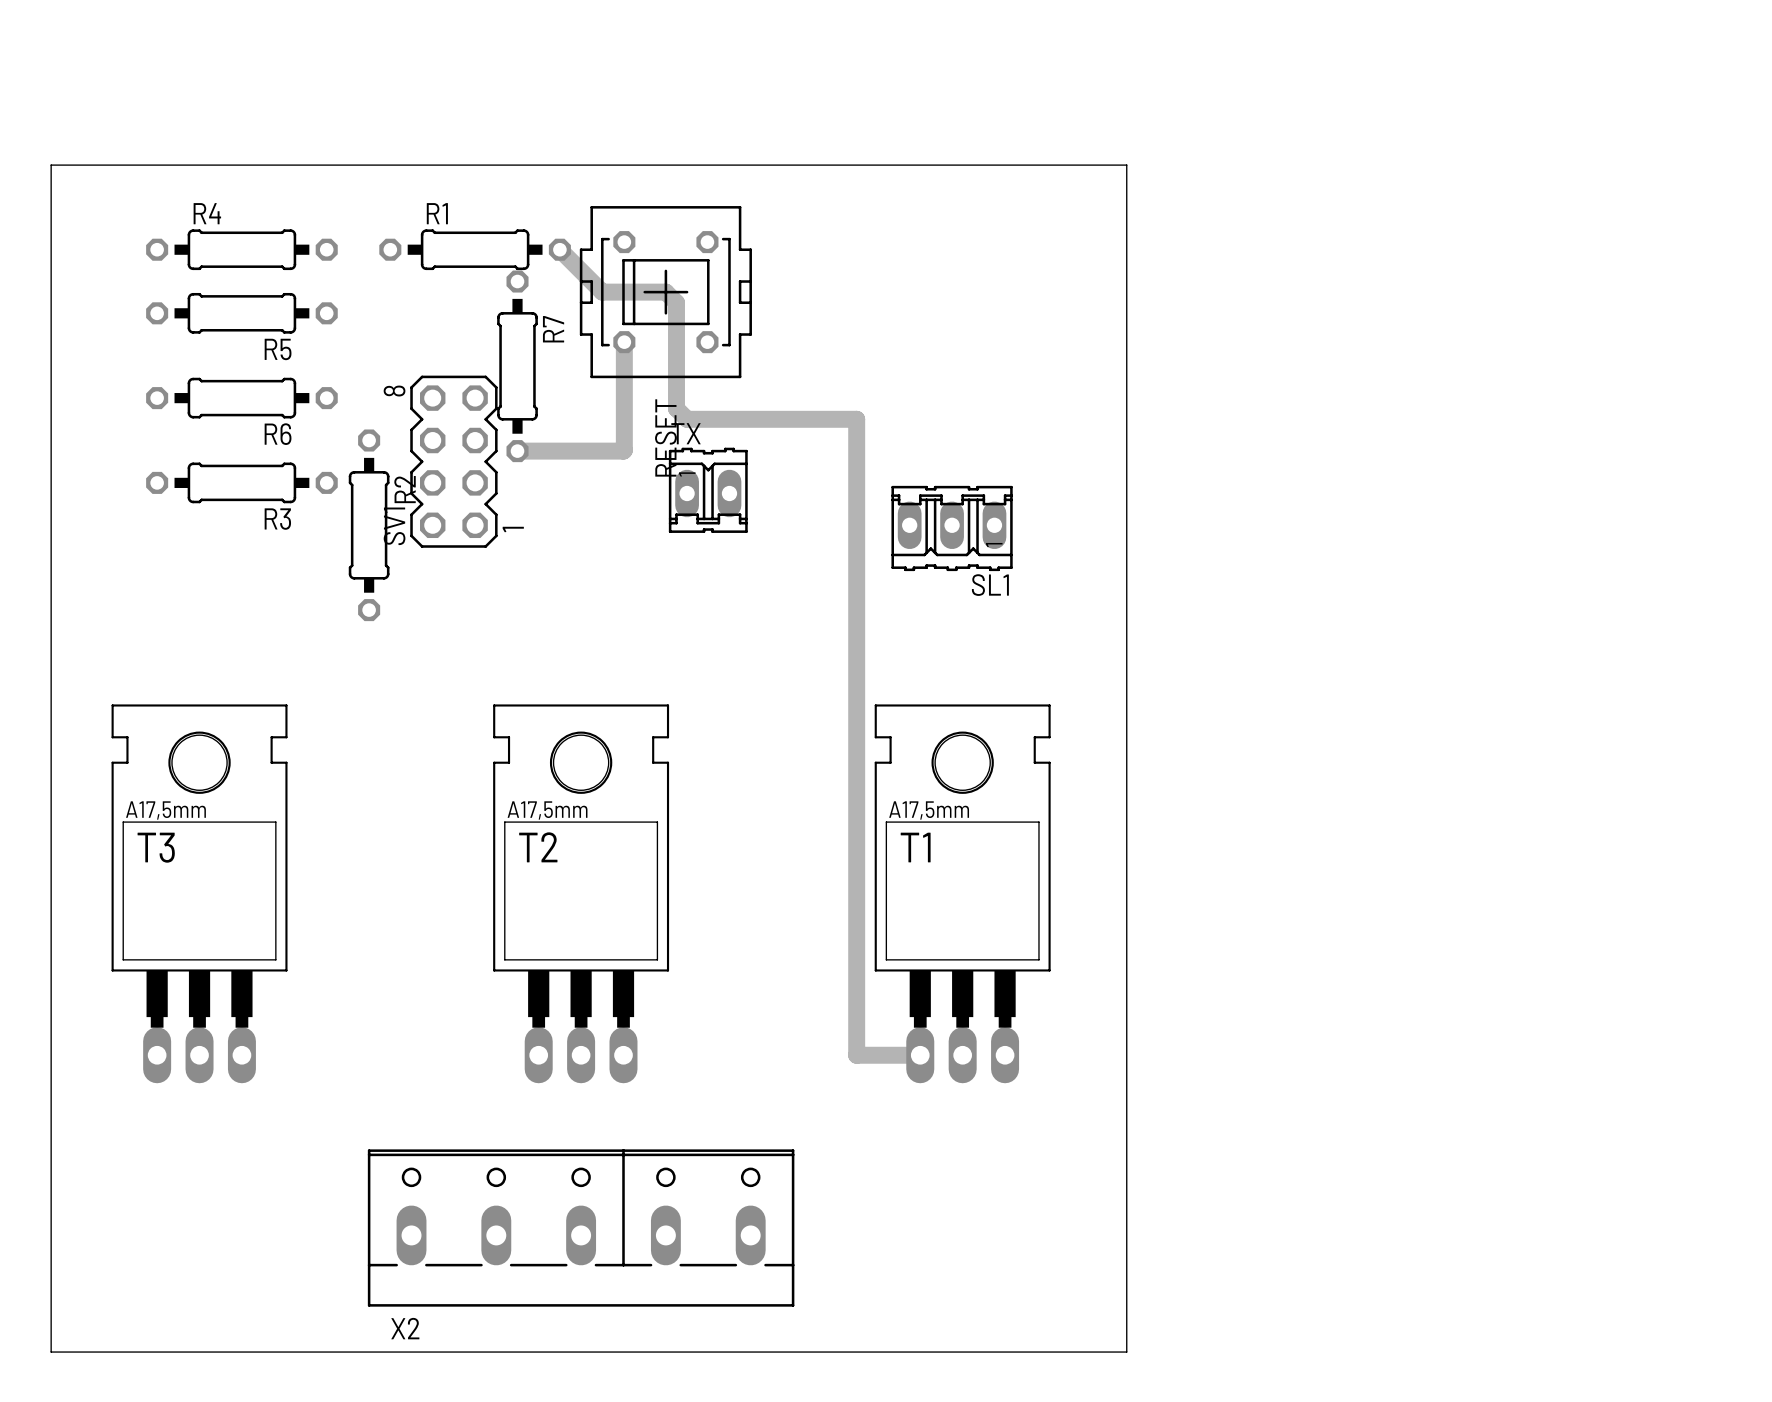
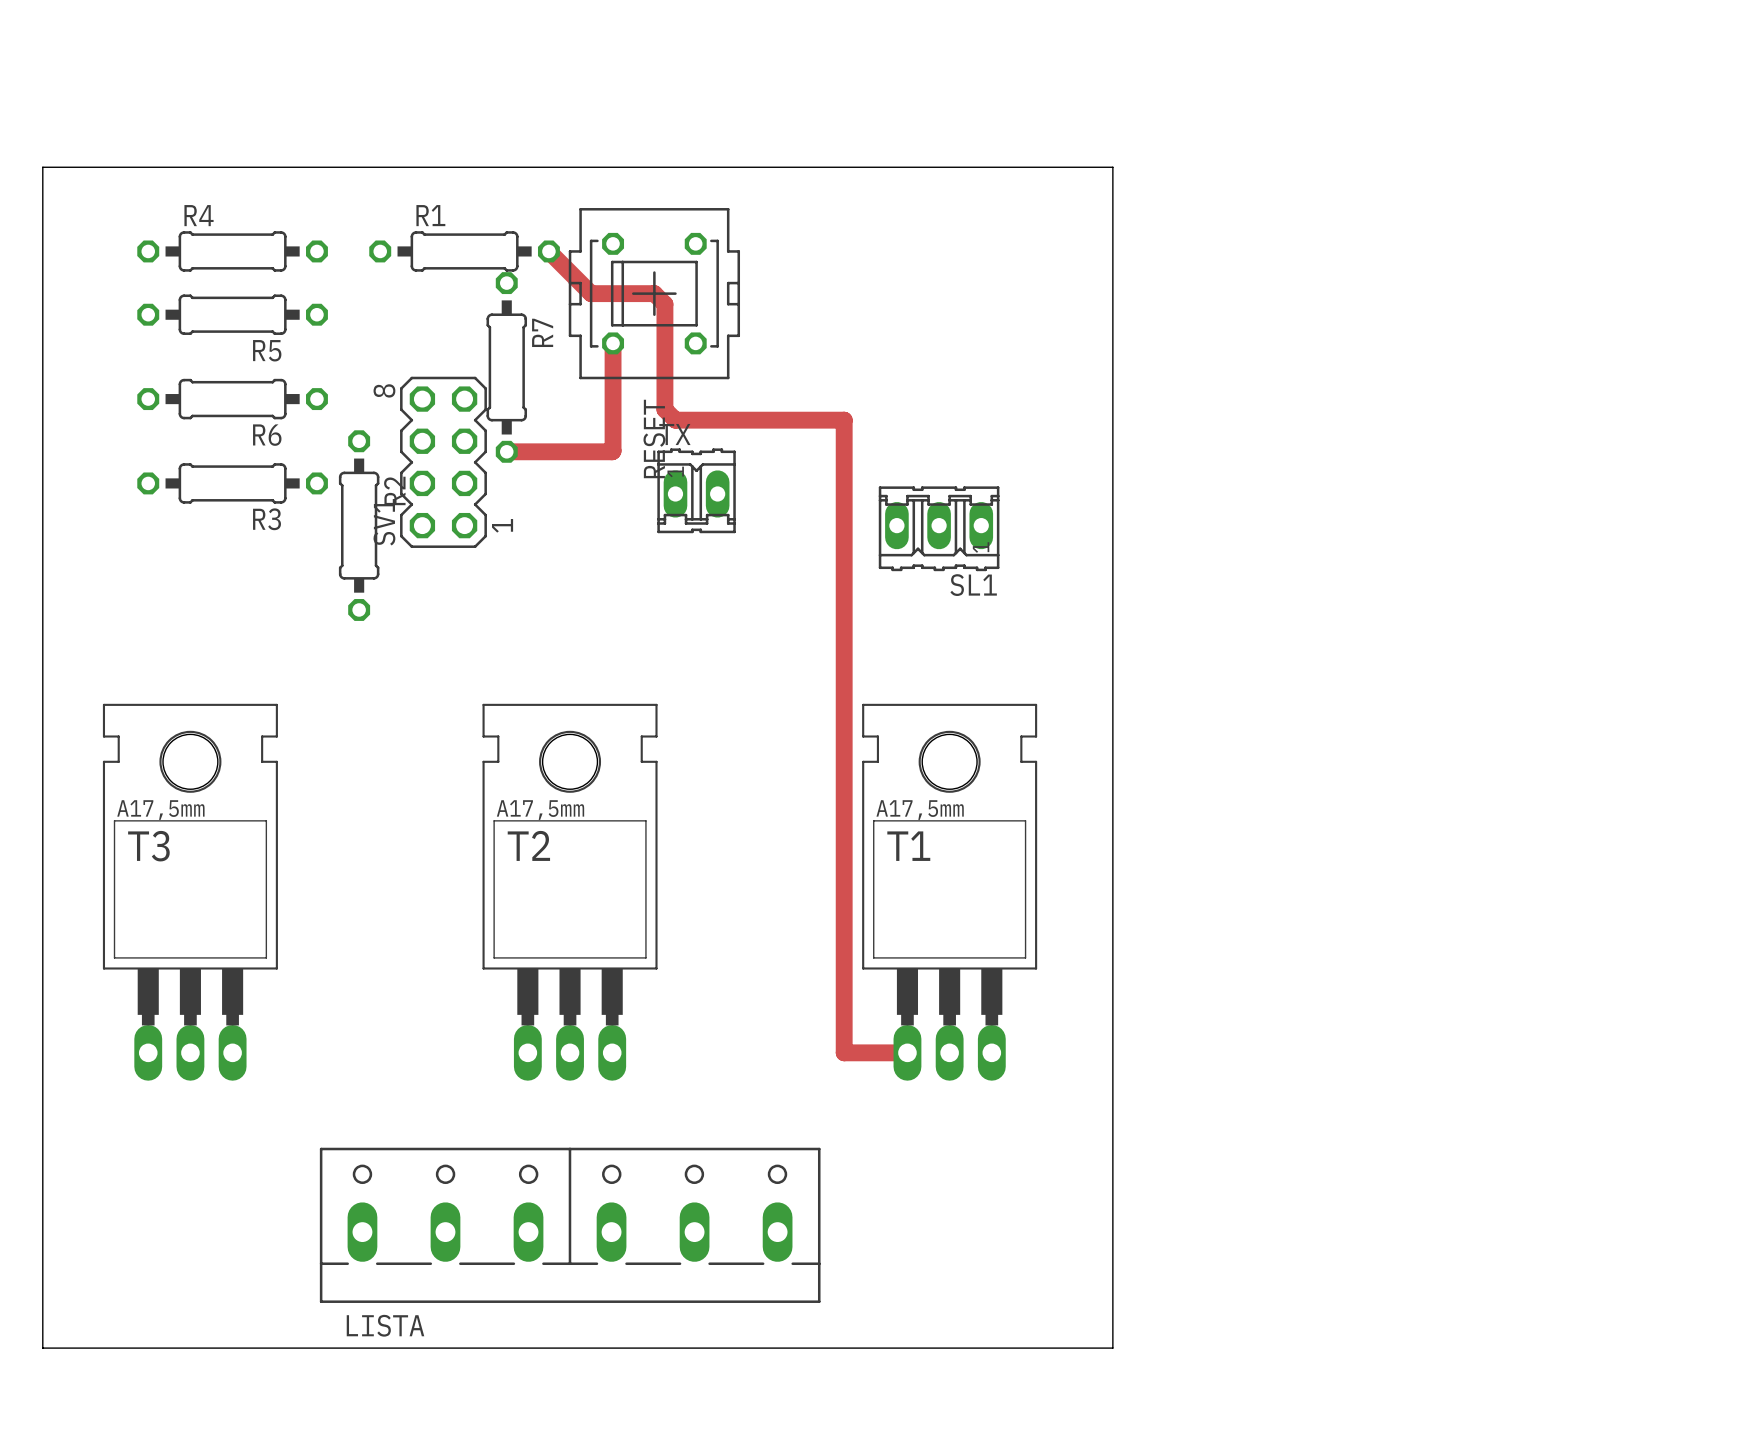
X2: (581, 1228) -> none
LISTA: none -> (570, 1225)

